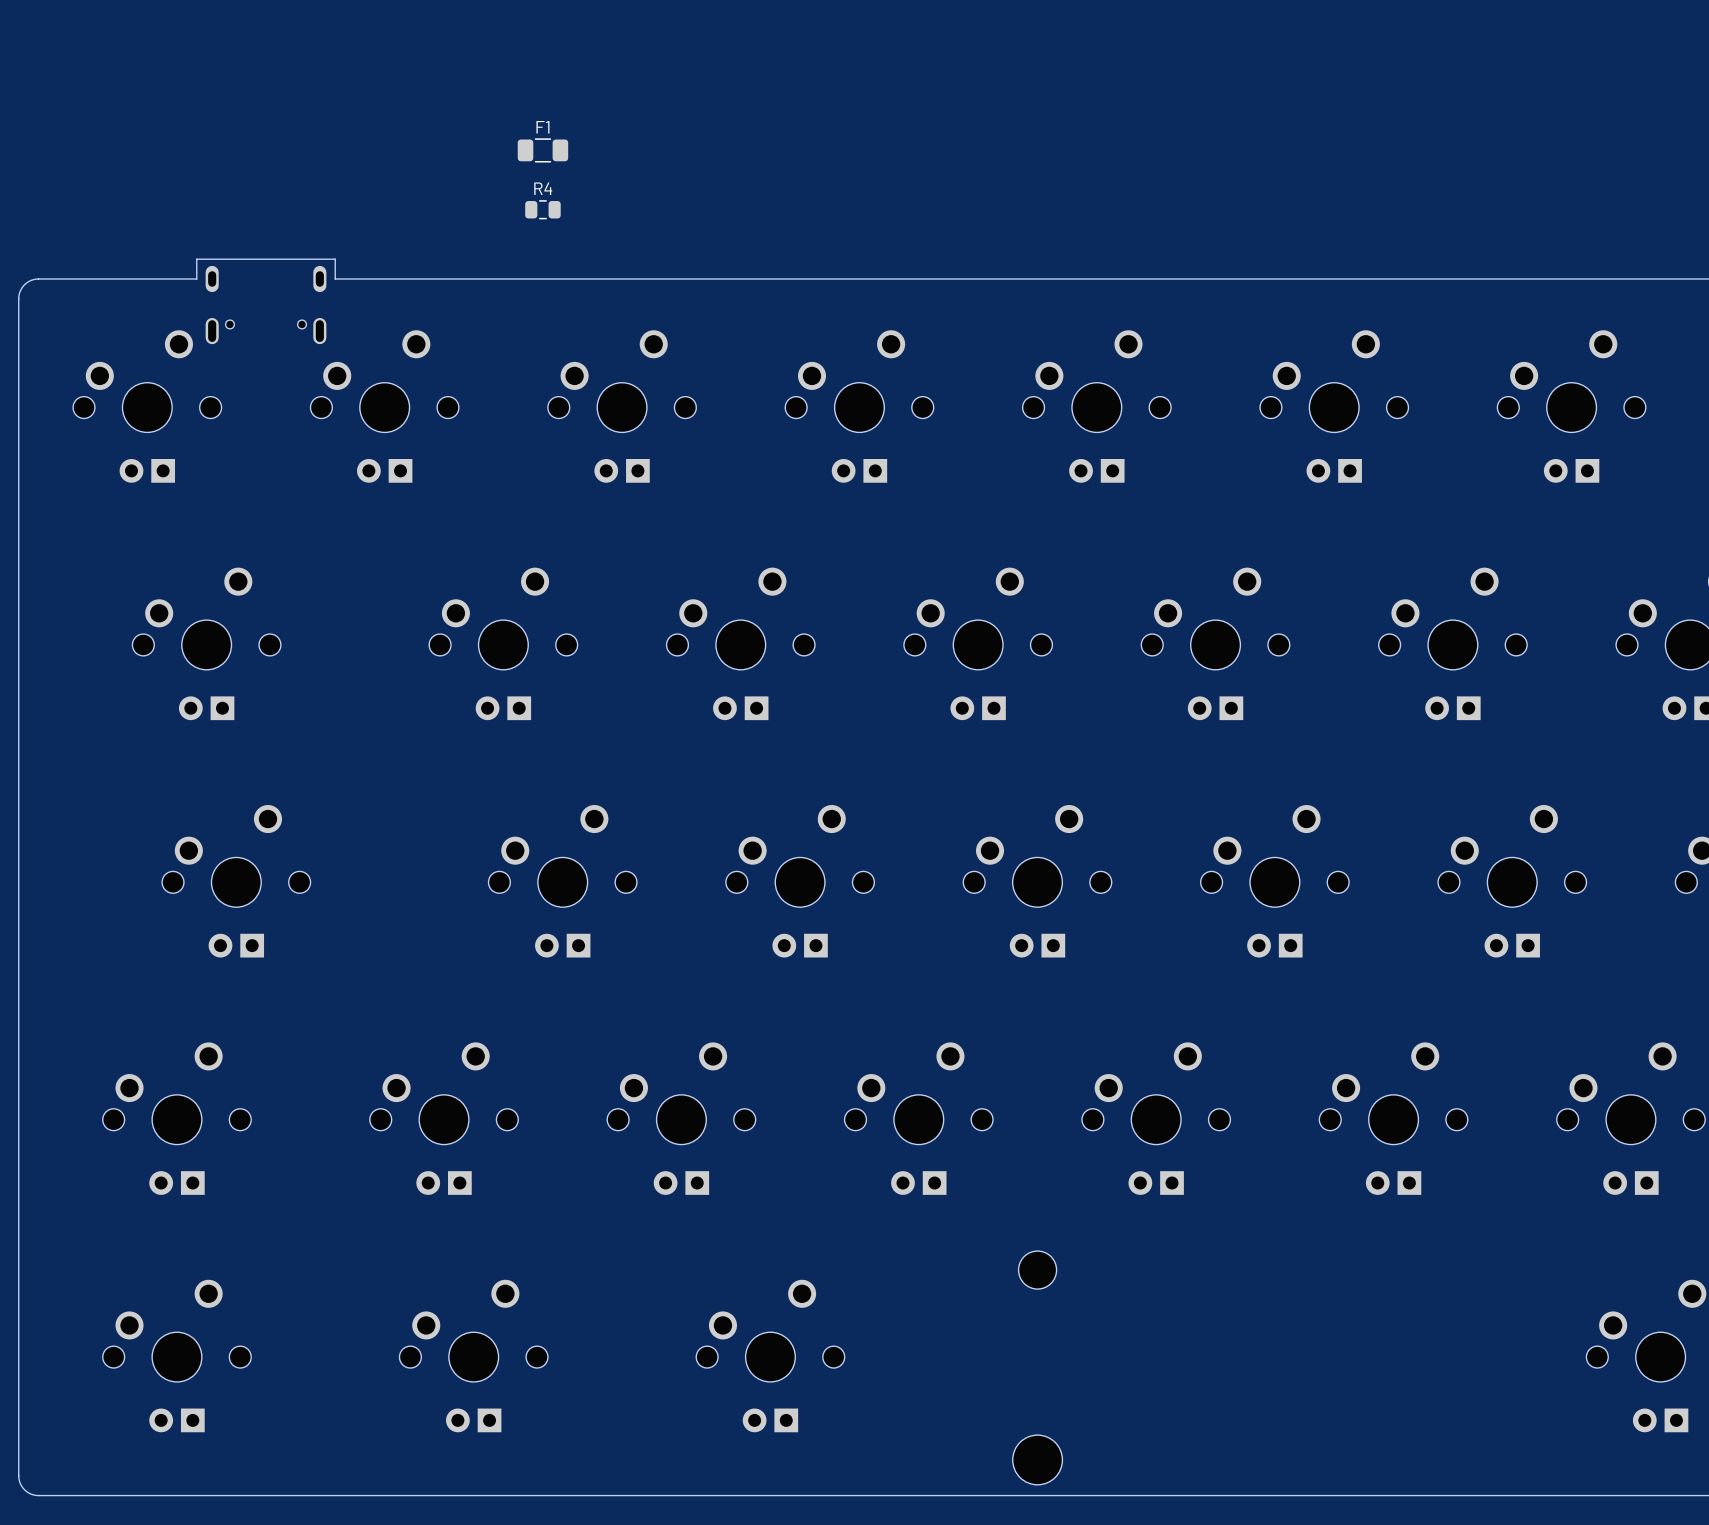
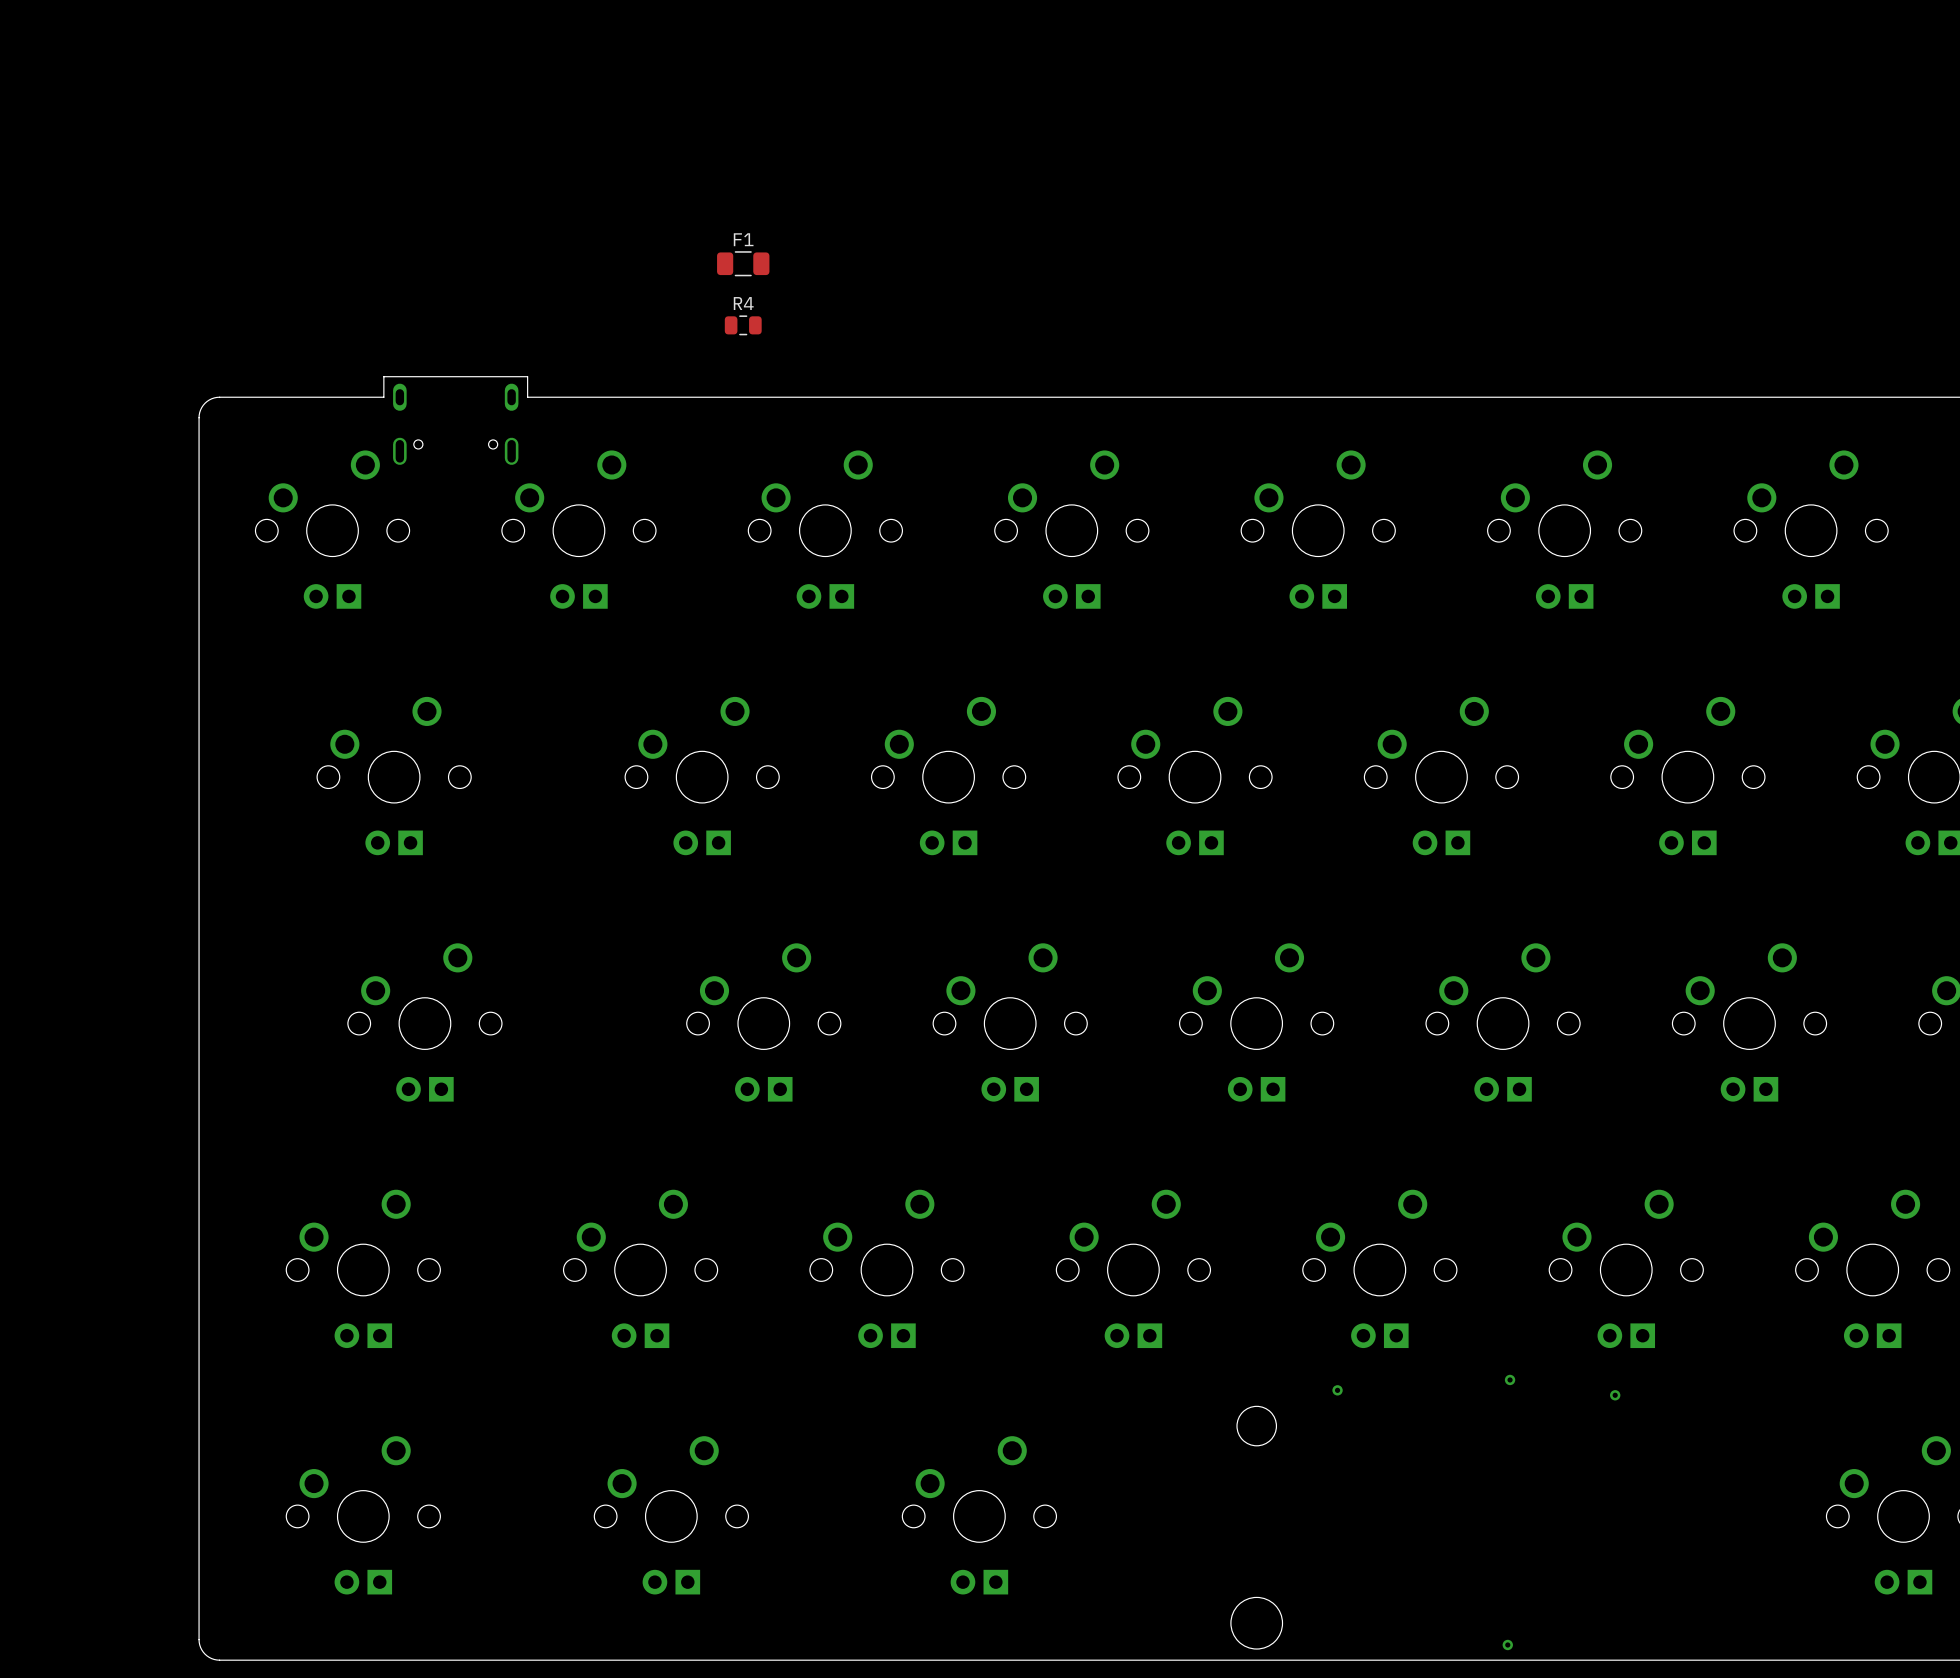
via: none -> (1510, 1379)
via: none -> (1337, 1390)
via: none -> (1615, 1395)
via: none -> (1507, 1644)

